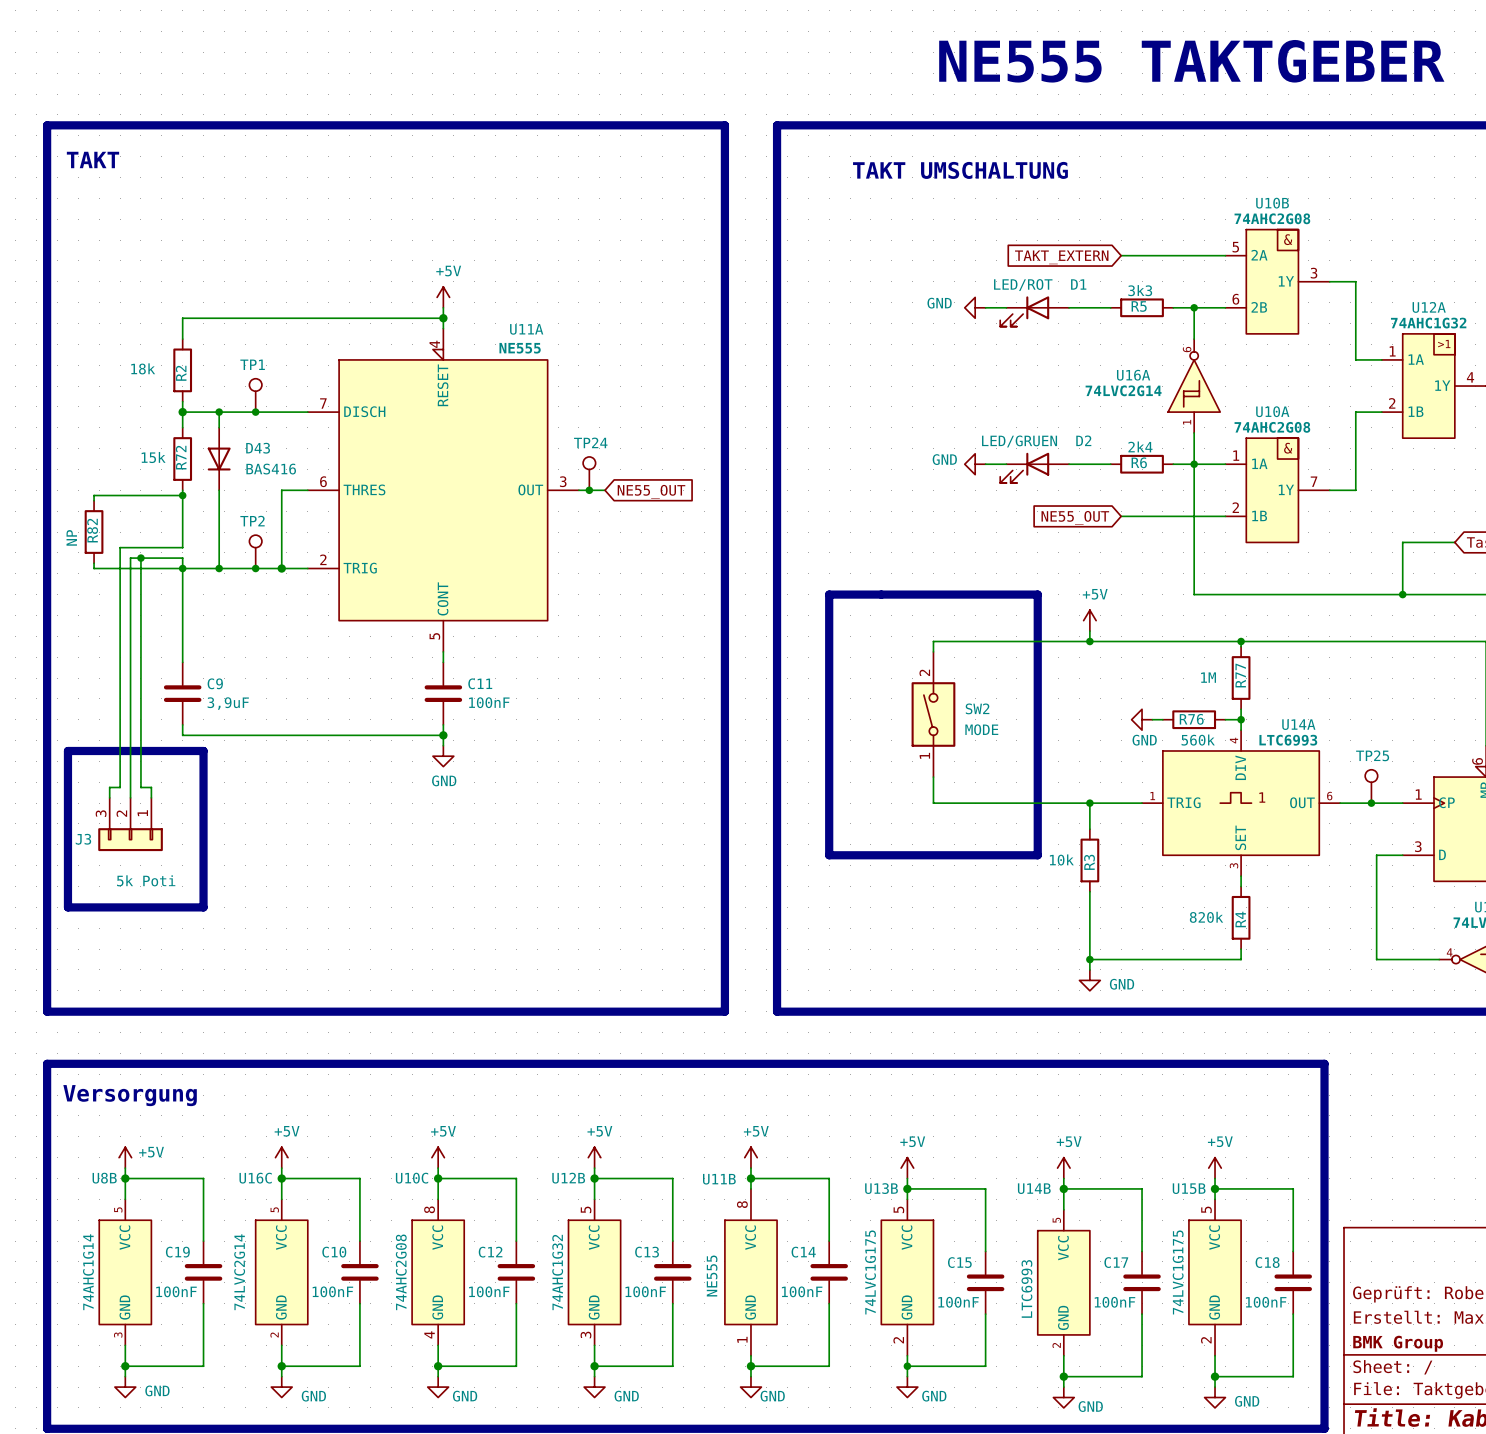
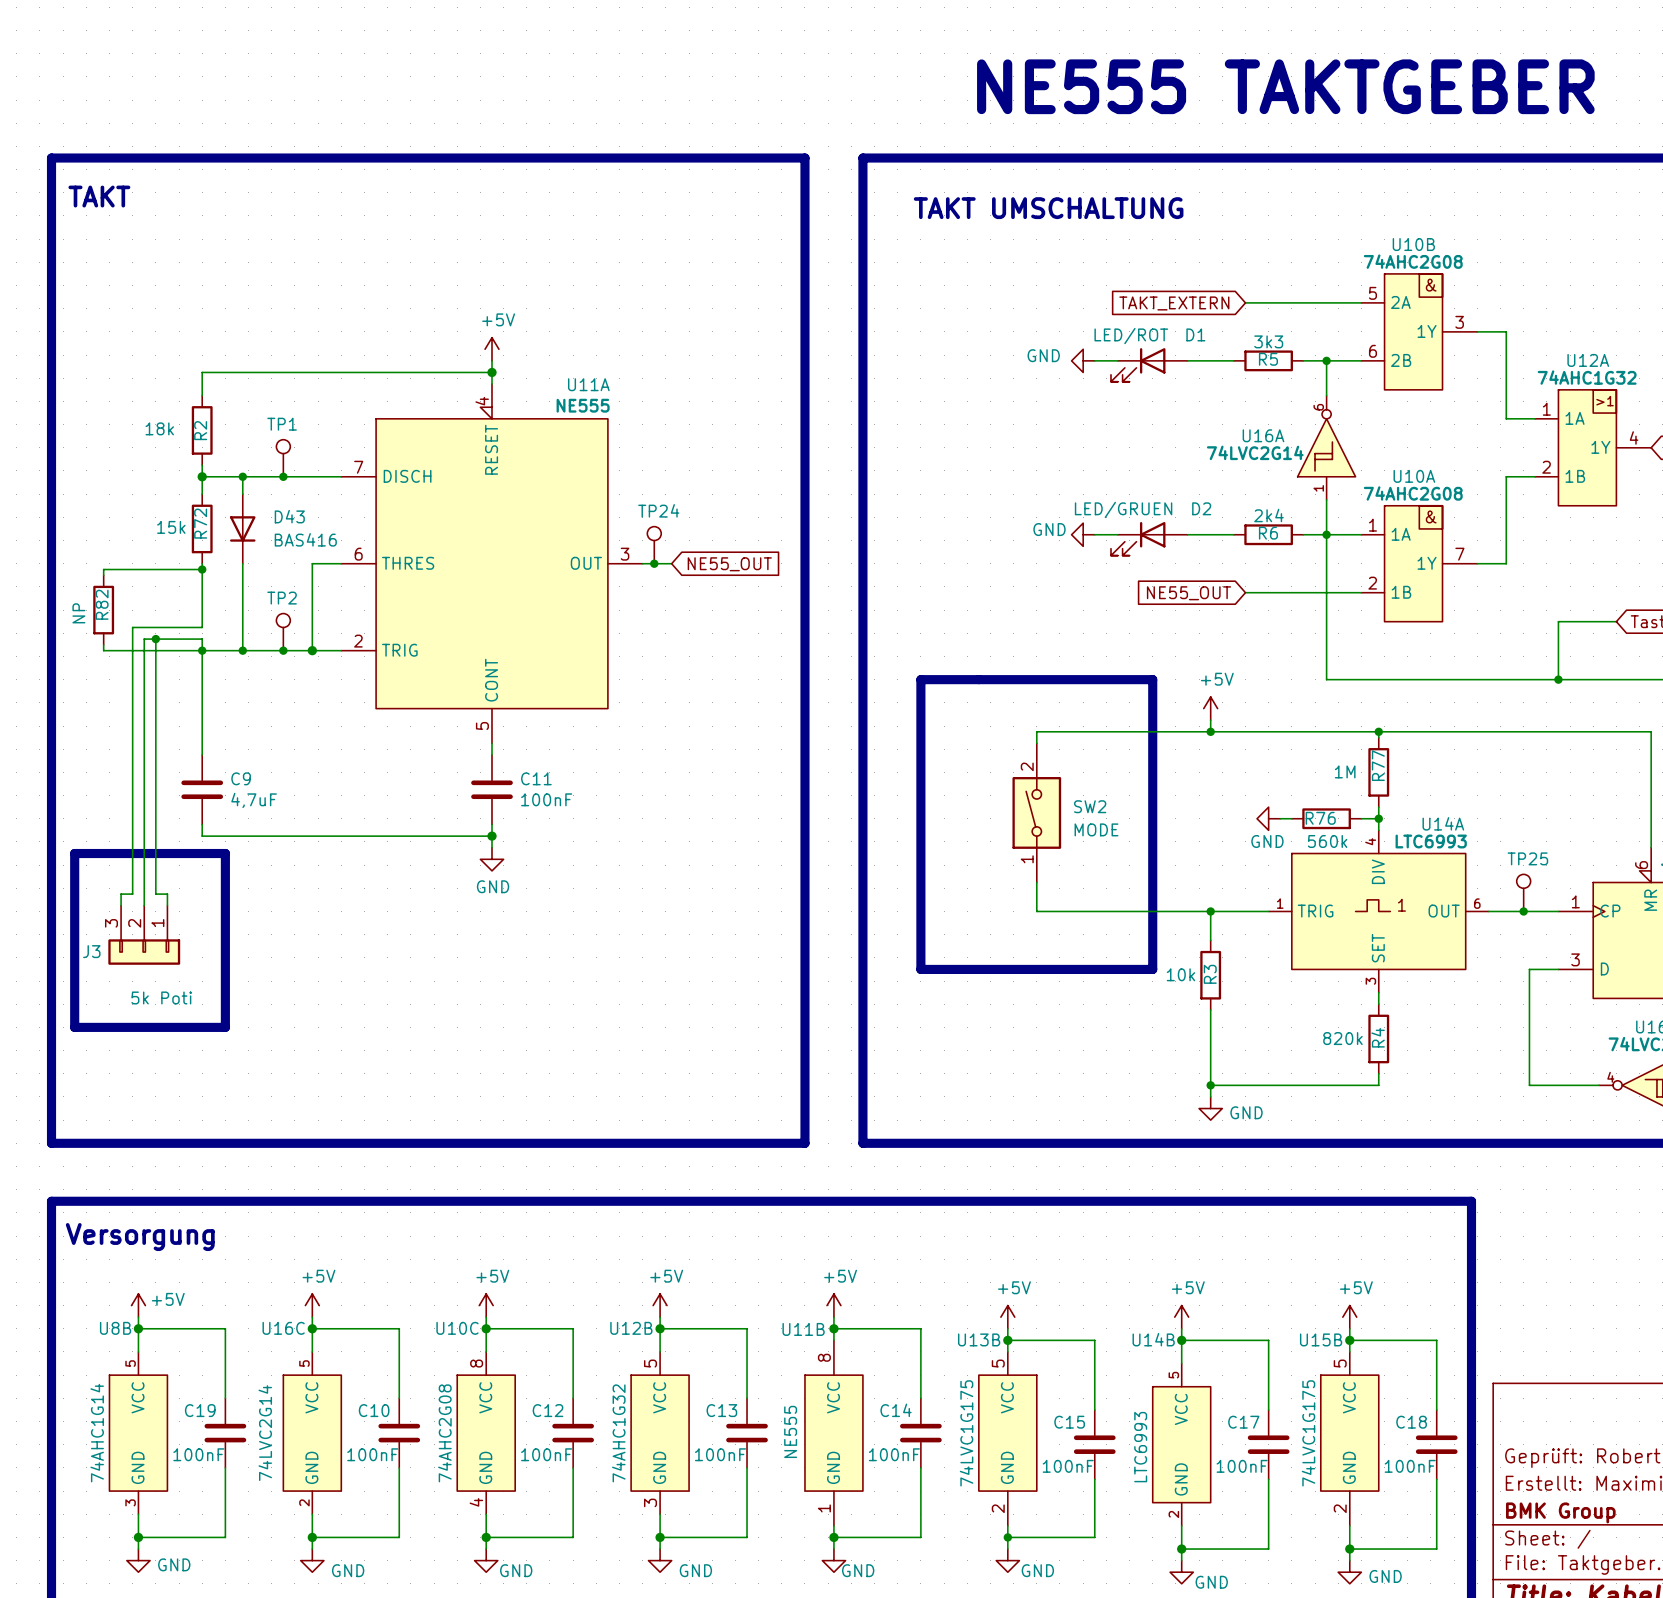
C9 value: 3,9uF (228, 703) -> 4,7uF (254, 800)

